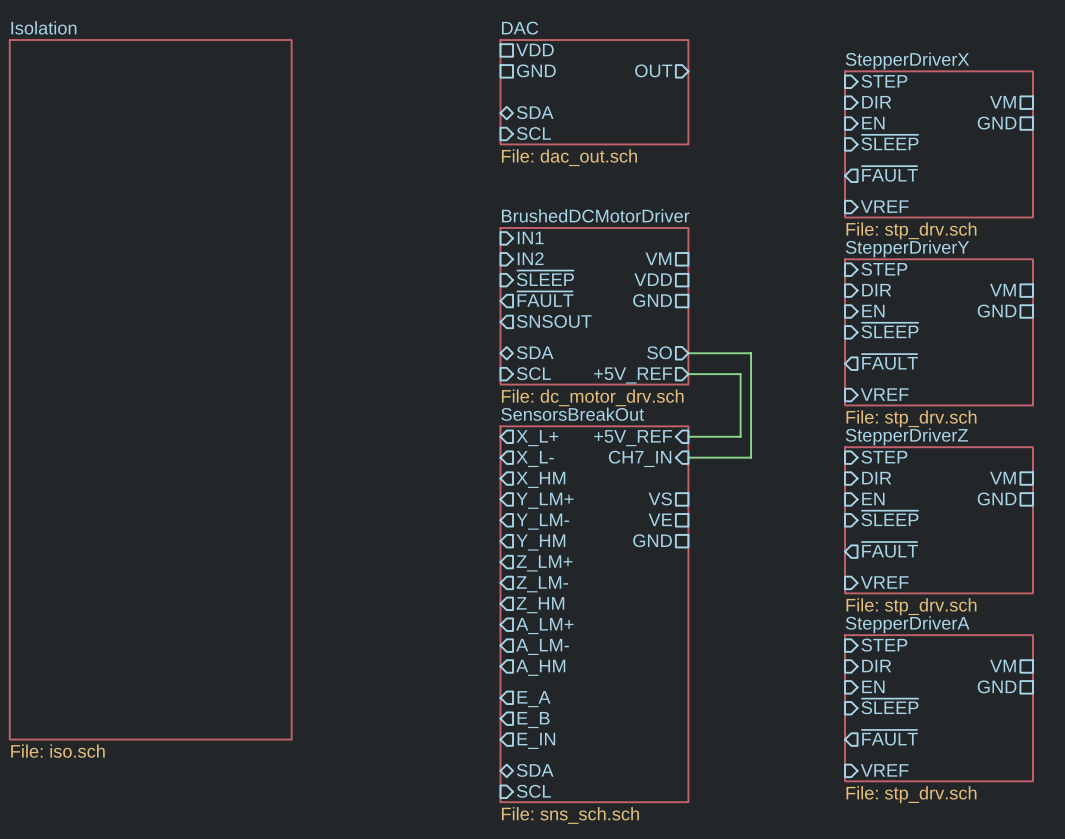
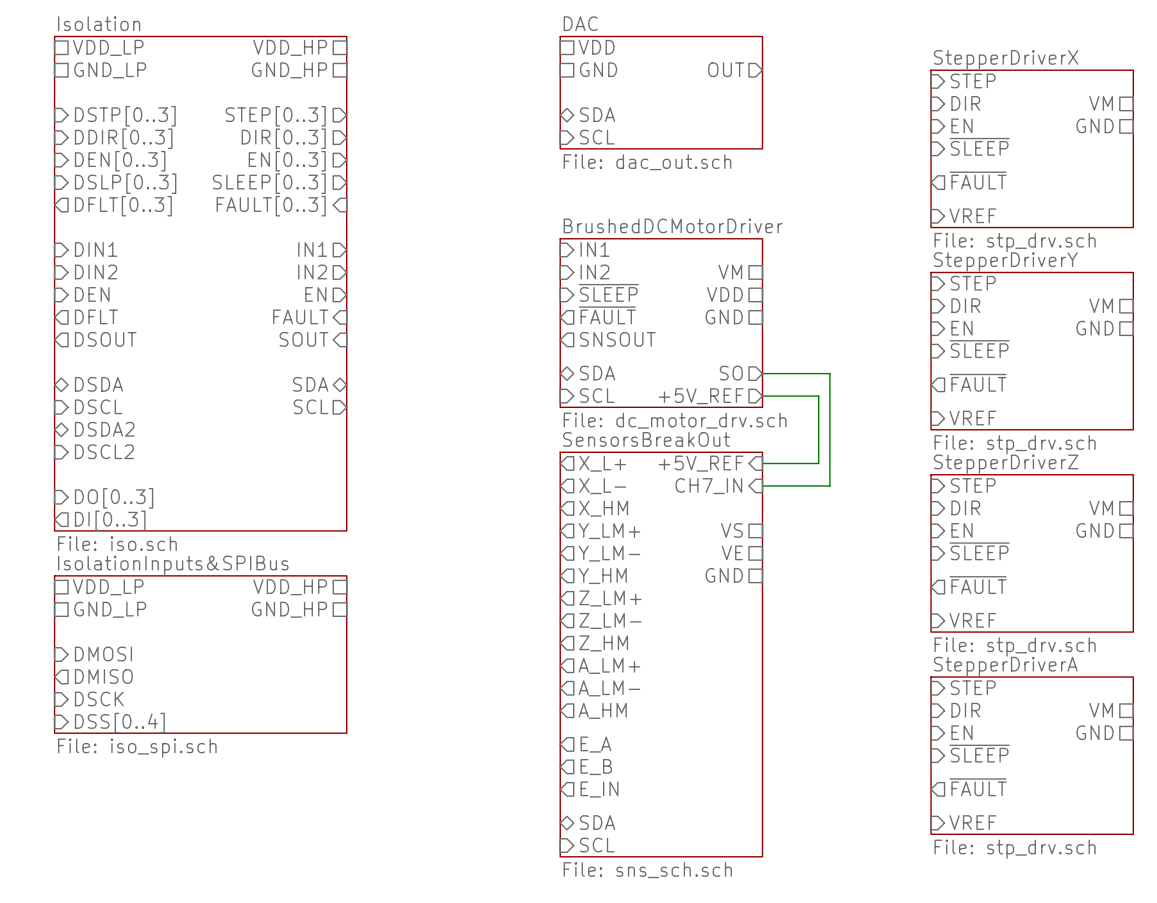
sheet pin: none -> VDD_LP (108, 47)
sheet pin: none -> VDD_HP (290, 47)
sheet pin: none -> GND_LP (110, 70)
sheet pin: none -> GND_HP (289, 70)
sheet pin: none -> DSTP[0..3] (125, 116)
sheet pin: none -> STEP[0..3] (275, 116)
sheet pin: none -> DDIR[0..3] (123, 138)
sheet pin: none -> DIR[0..3] (283, 138)
sheet pin: none -> DEN[0..3] (120, 161)
sheet pin: none -> EN[0..3] (287, 161)
sheet pin: none -> DSLP[0..3] (125, 183)
sheet pin: none -> SLEEP[0..3] (269, 183)
sheet pin: none -> DFLT[0..3] (123, 206)
sheet pin: none -> FAULT[0..3] (271, 206)
sheet pin: none -> DIN1 (96, 249)
sheet pin: none -> IN1 (312, 249)
sheet pin: none -> DIN2 (96, 271)
sheet pin: none -> IN2 (312, 271)
sheet Isolation: none -> File: iso.sch (200, 283)
sheet pin: none -> DEN (92, 294)
sheet pin: none -> EN (315, 294)
sheet pin: none -> DFLT (96, 316)
sheet pin: none -> FAULT (300, 316)
sheet pin: none -> DSOUT (105, 339)
sheet pin: none -> SOUT (303, 339)
sheet pin: none -> DSDA (98, 384)
sheet pin: none -> SDA (310, 384)
sheet pin: none -> DSCL (98, 406)
sheet pin: none -> SCL (311, 406)
sheet Isolation: File: iso.sch (150, 389) -> none
sheet pin: none -> DSDA2 (104, 429)
sheet pin: none -> DSCL2 (104, 451)
sheet pin: none -> DO[0..3] (114, 498)
sheet pin: none -> DI[0..3] (110, 520)
sheet pin: none -> VDD_LP (108, 587)
sheet pin: none -> VDD_HP (290, 587)
sheet pin: none -> GND_LP (110, 609)
sheet pin: none -> GND_HP (289, 609)
sheet pin: none -> DMOSI (103, 654)
sheet IsolationInputs&SPIBus: none -> File: iso_spi.sch (200, 654)
sheet pin: none -> DMISO (103, 676)
sheet pin: none -> DSCK (99, 698)
sheet pin: none -> DSS[0..4] (119, 723)

